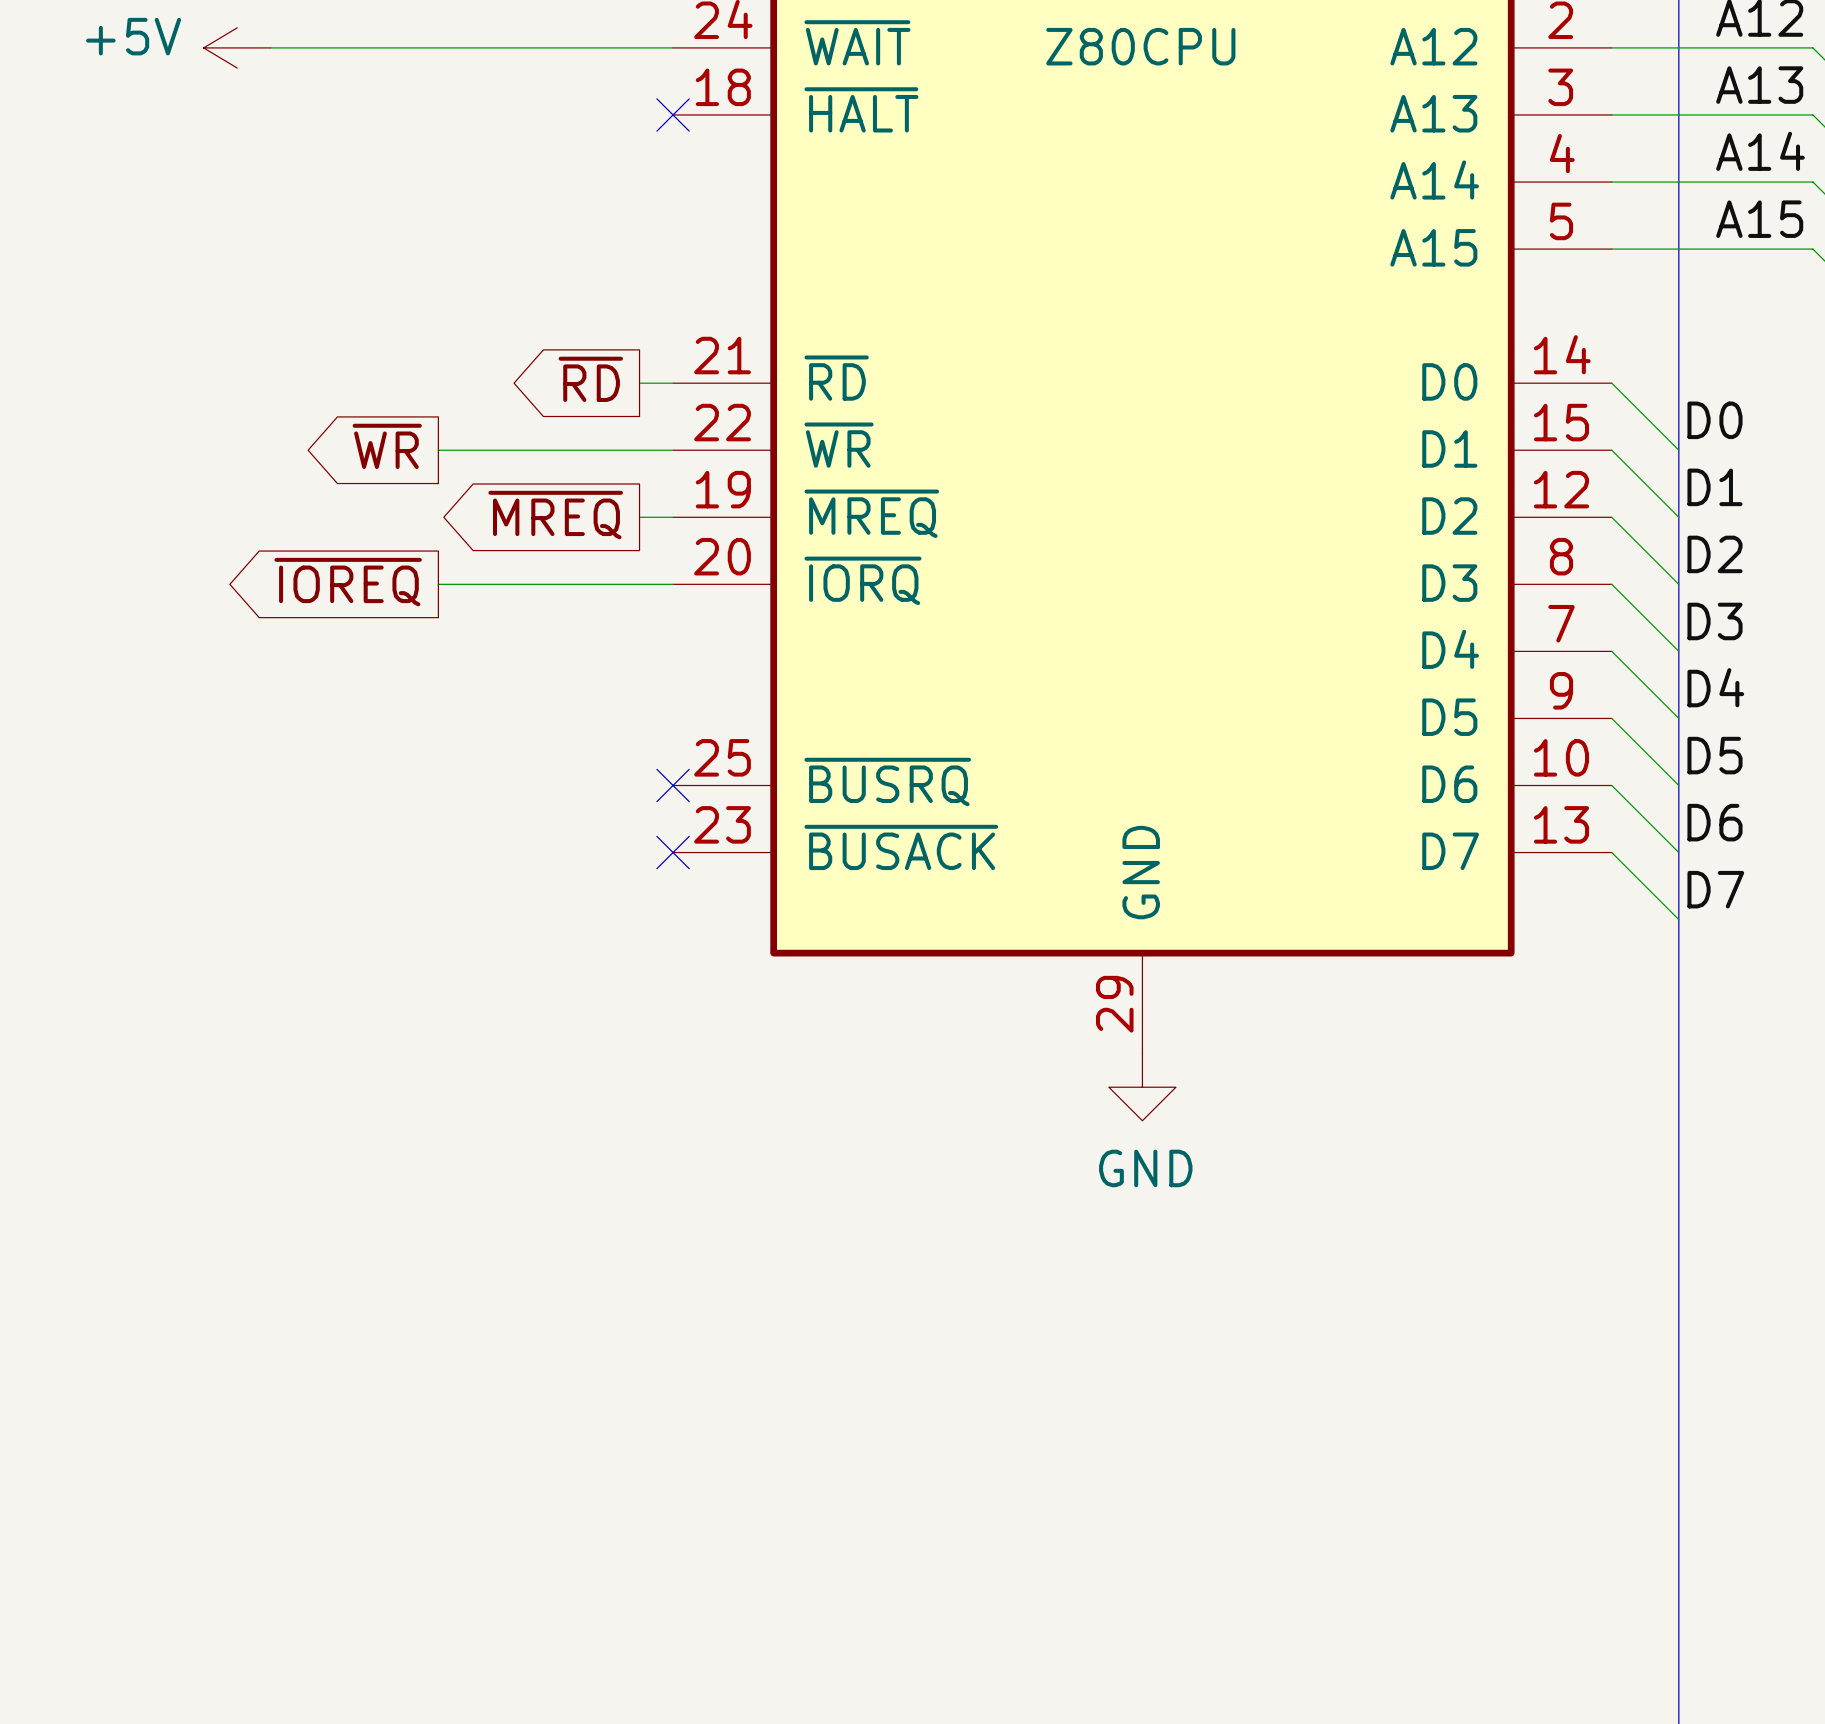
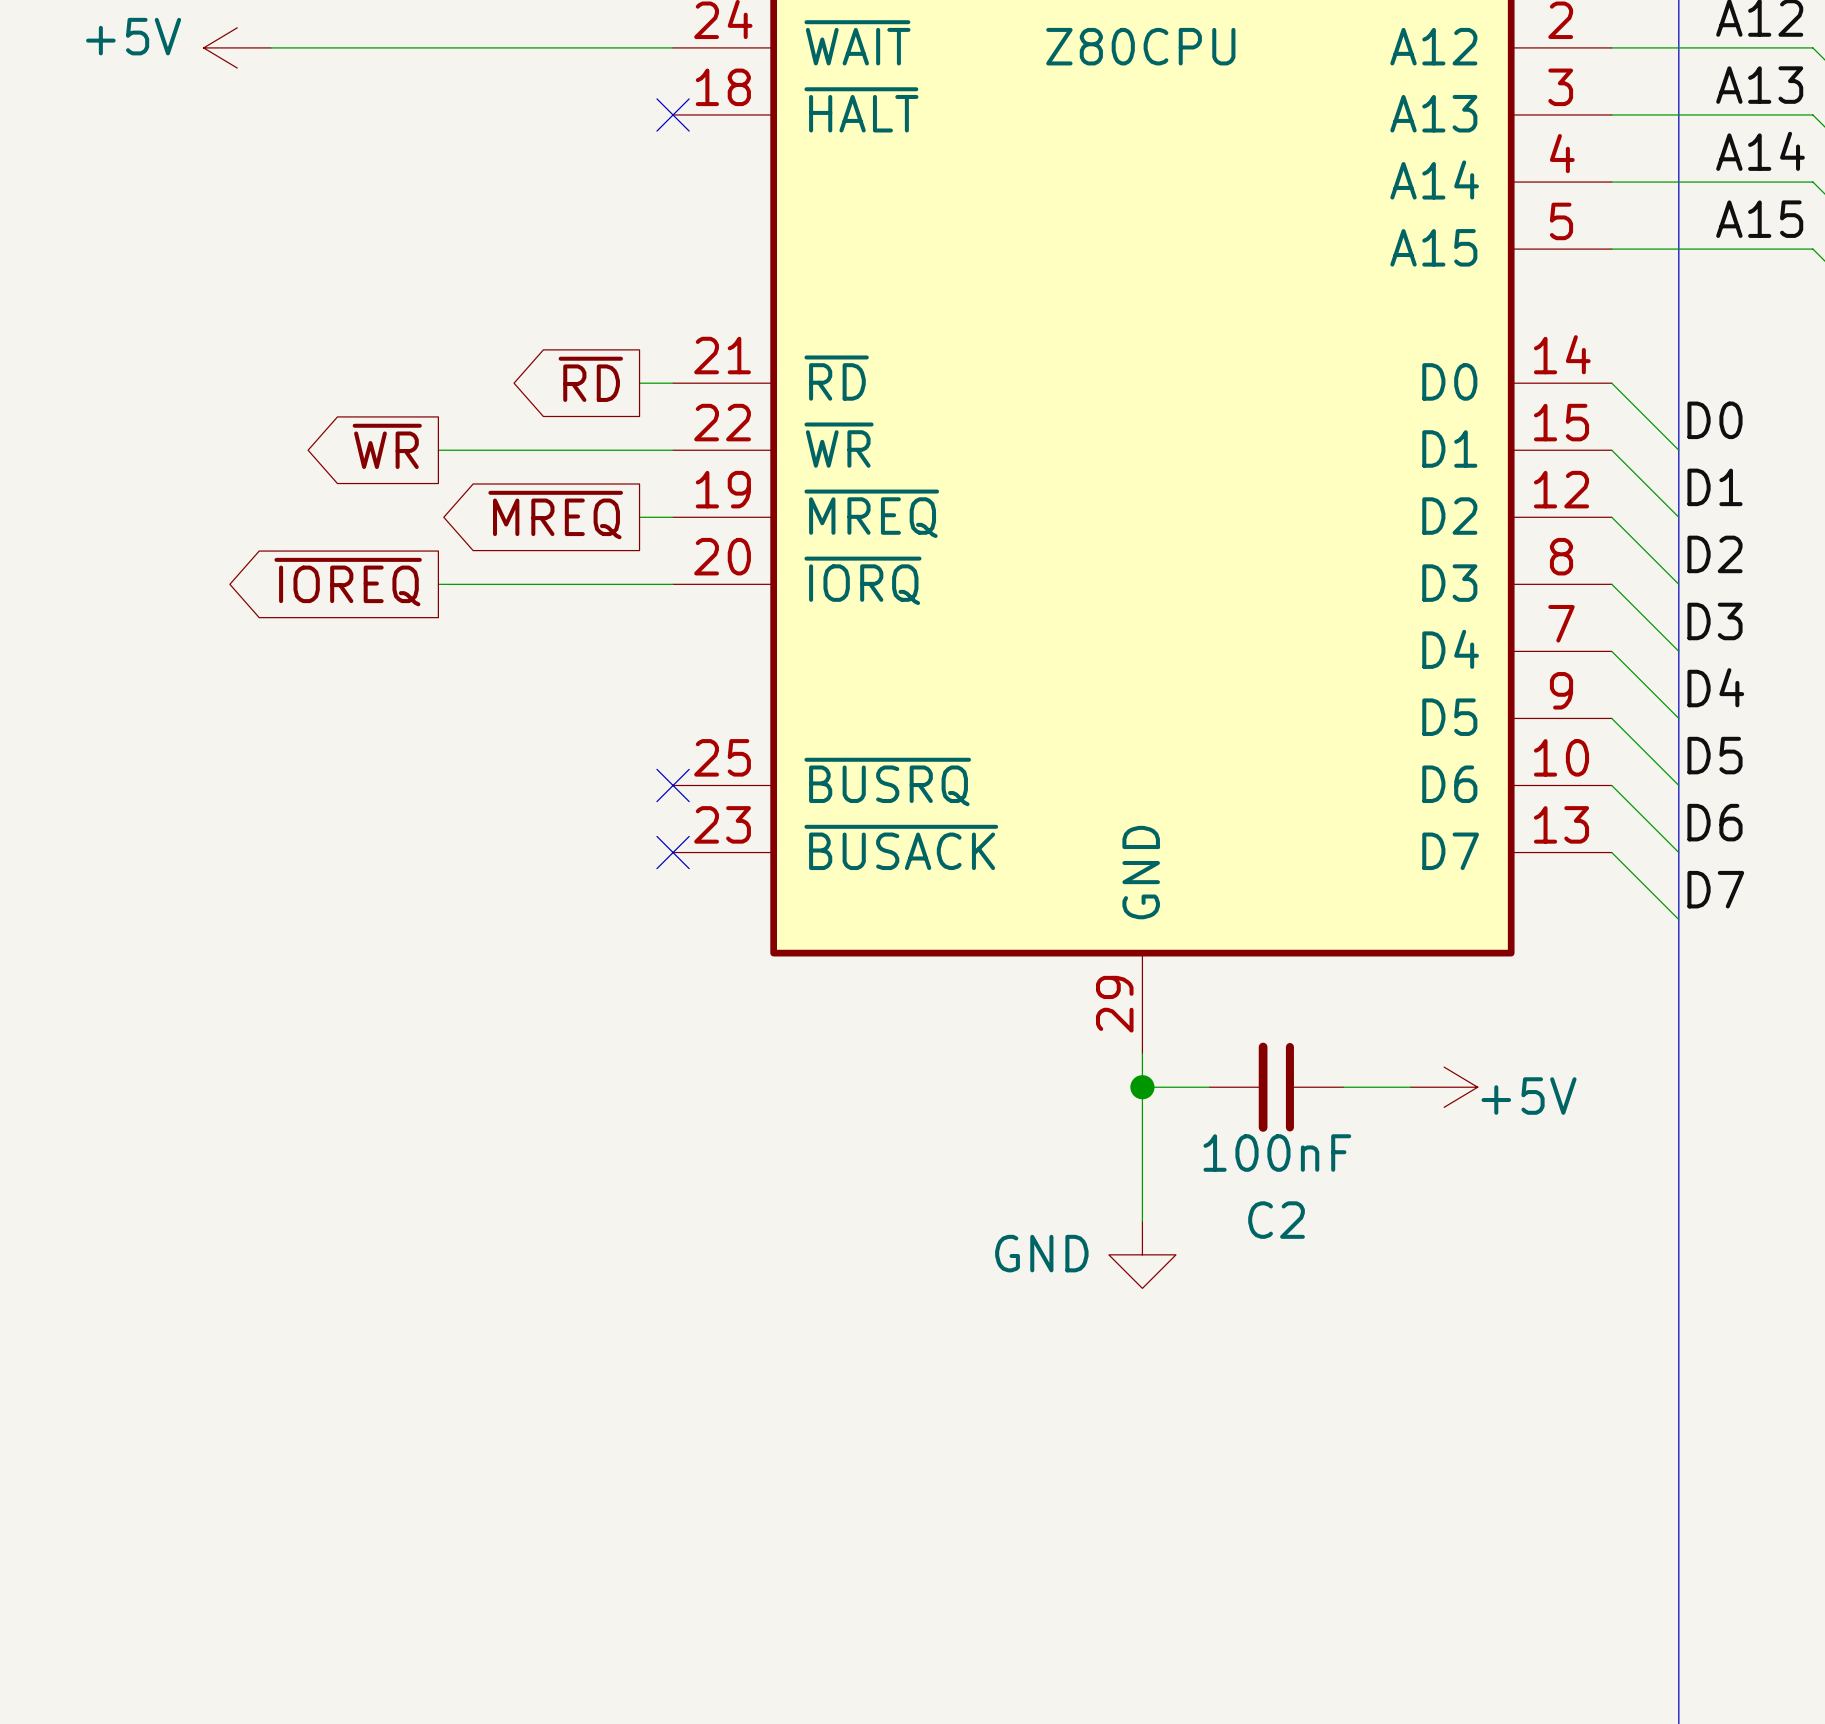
wire: none -> (1142, 1053) (1142, 1221)
wire: none -> (1142, 1087) (1209, 1087)
power symbol position: GND (1142, 1087) -> GND (1142, 1254)
junction: none -> (1142, 1087)
C2: none -> 100nF (1276, 1087)
wire: none -> (1343, 1087) (1410, 1087)
power symbol: none -> +5V (1444, 1087)
power symbol text position: GND (1145, 1168) -> GND (1041, 1253)

